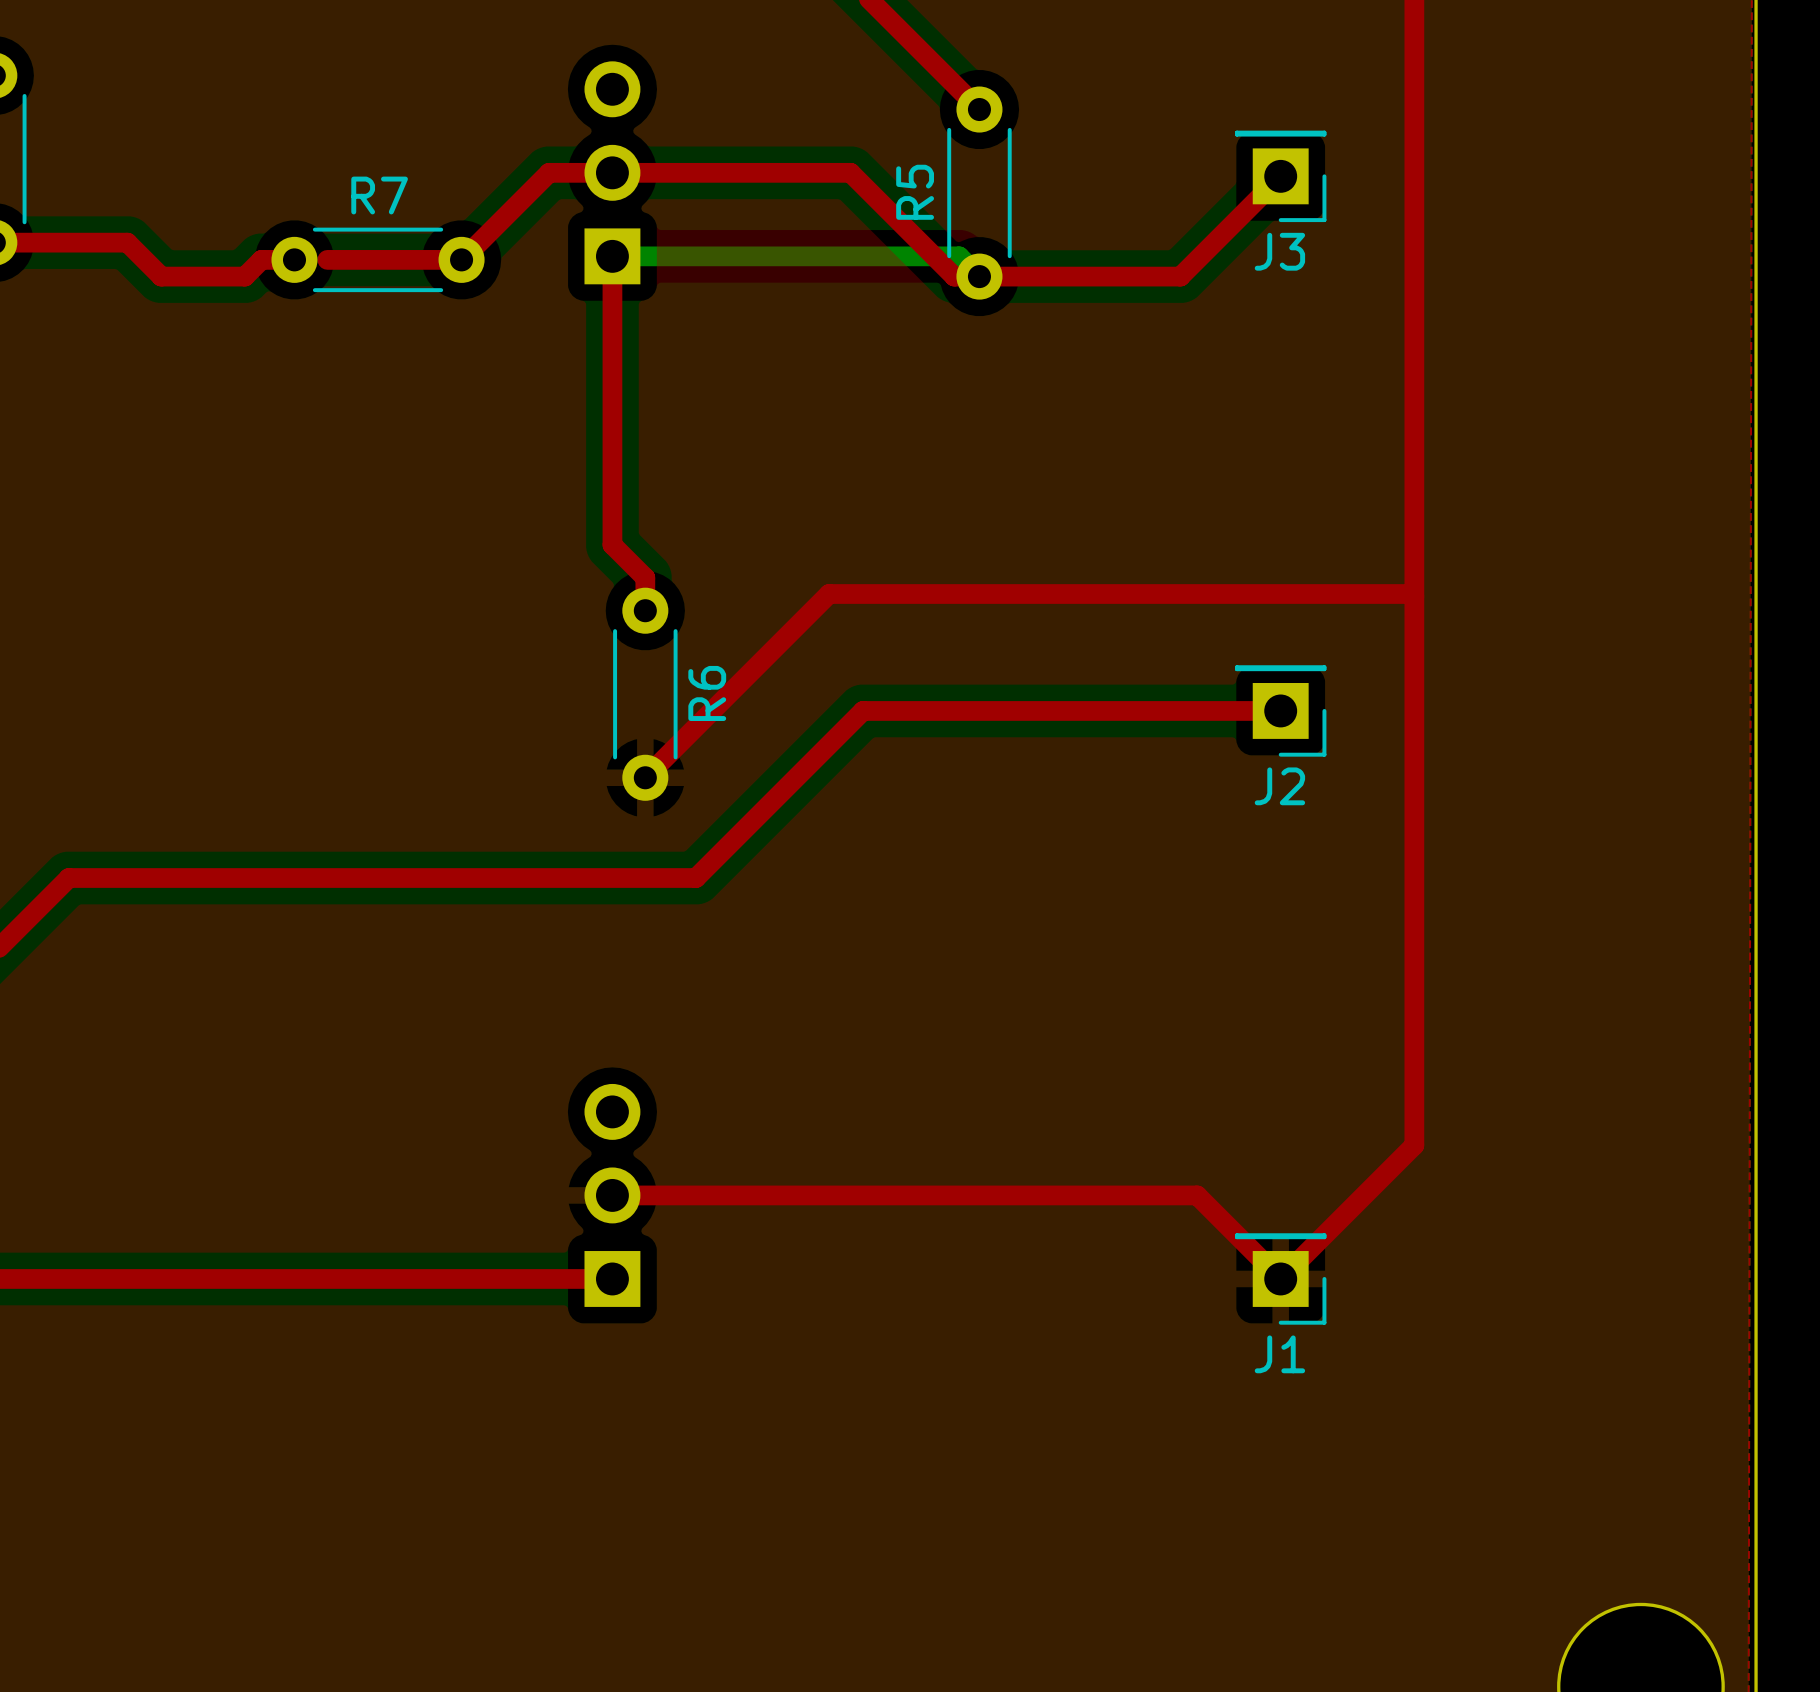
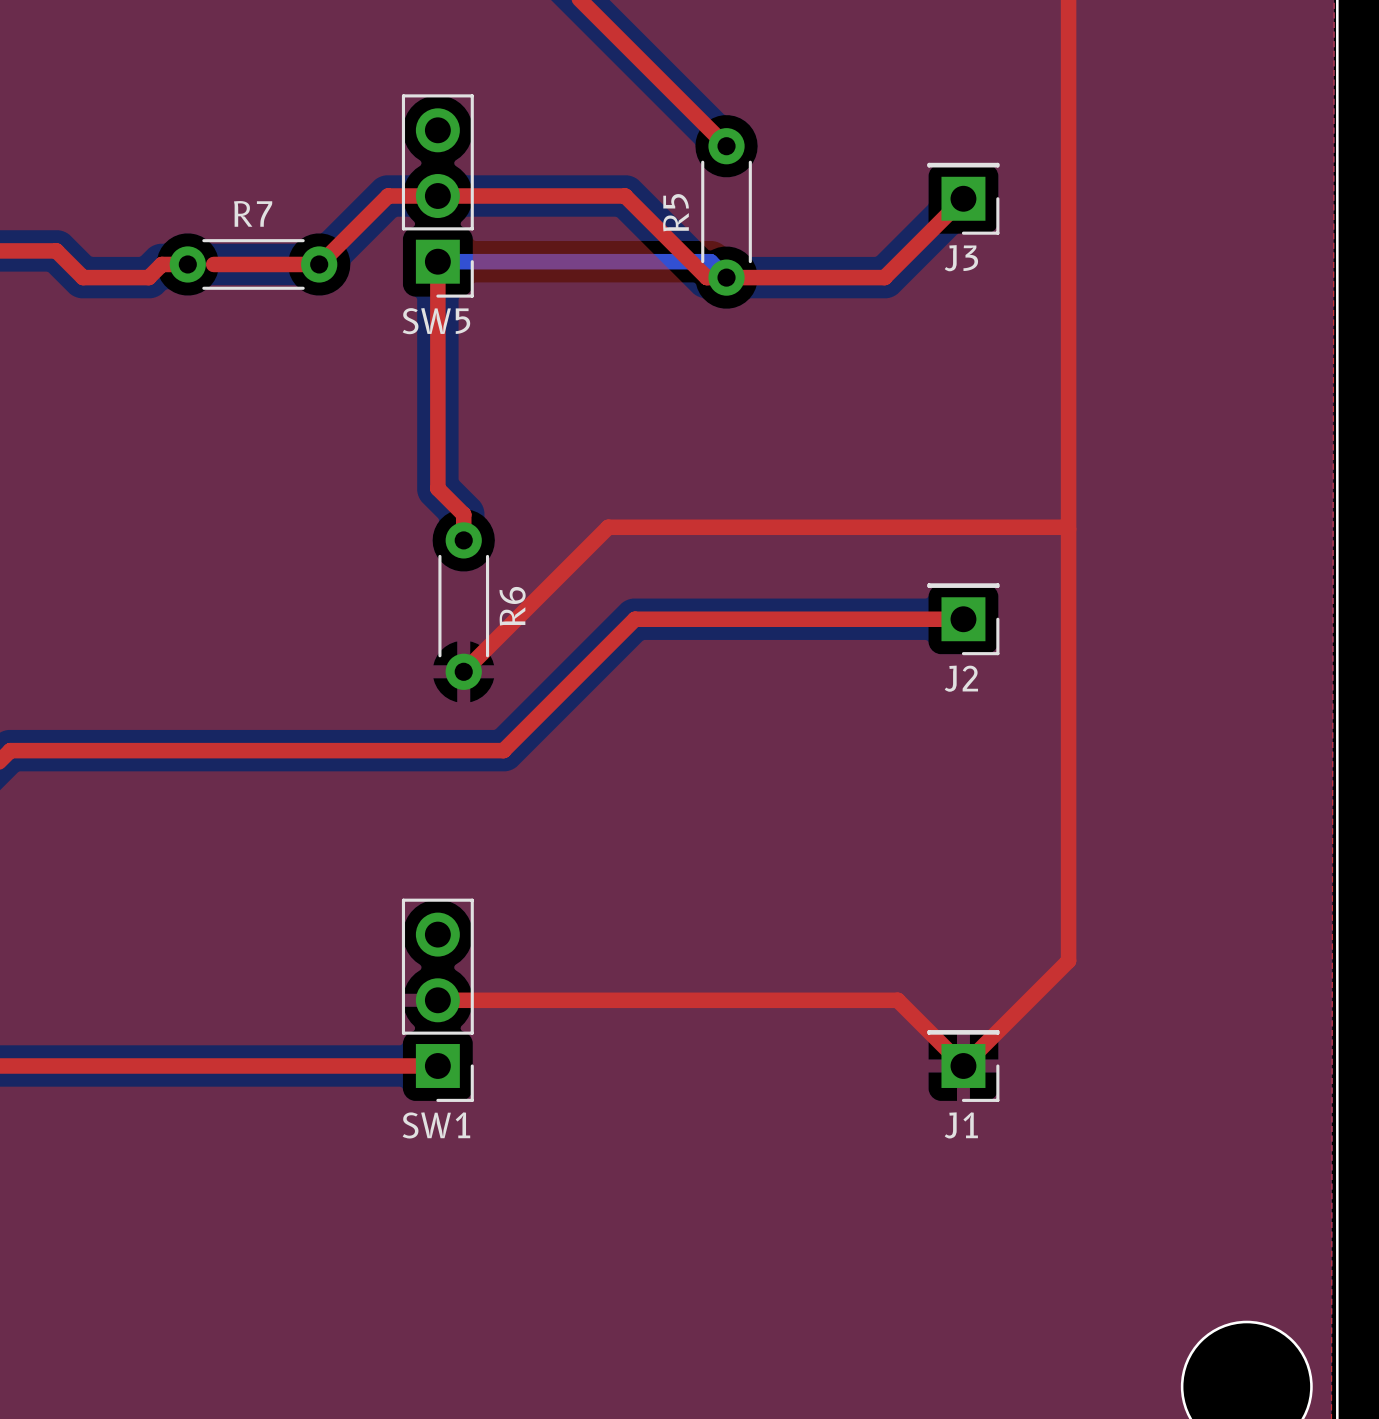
SW5: none -> (437, 196)
SW1: none -> (437, 1000)

